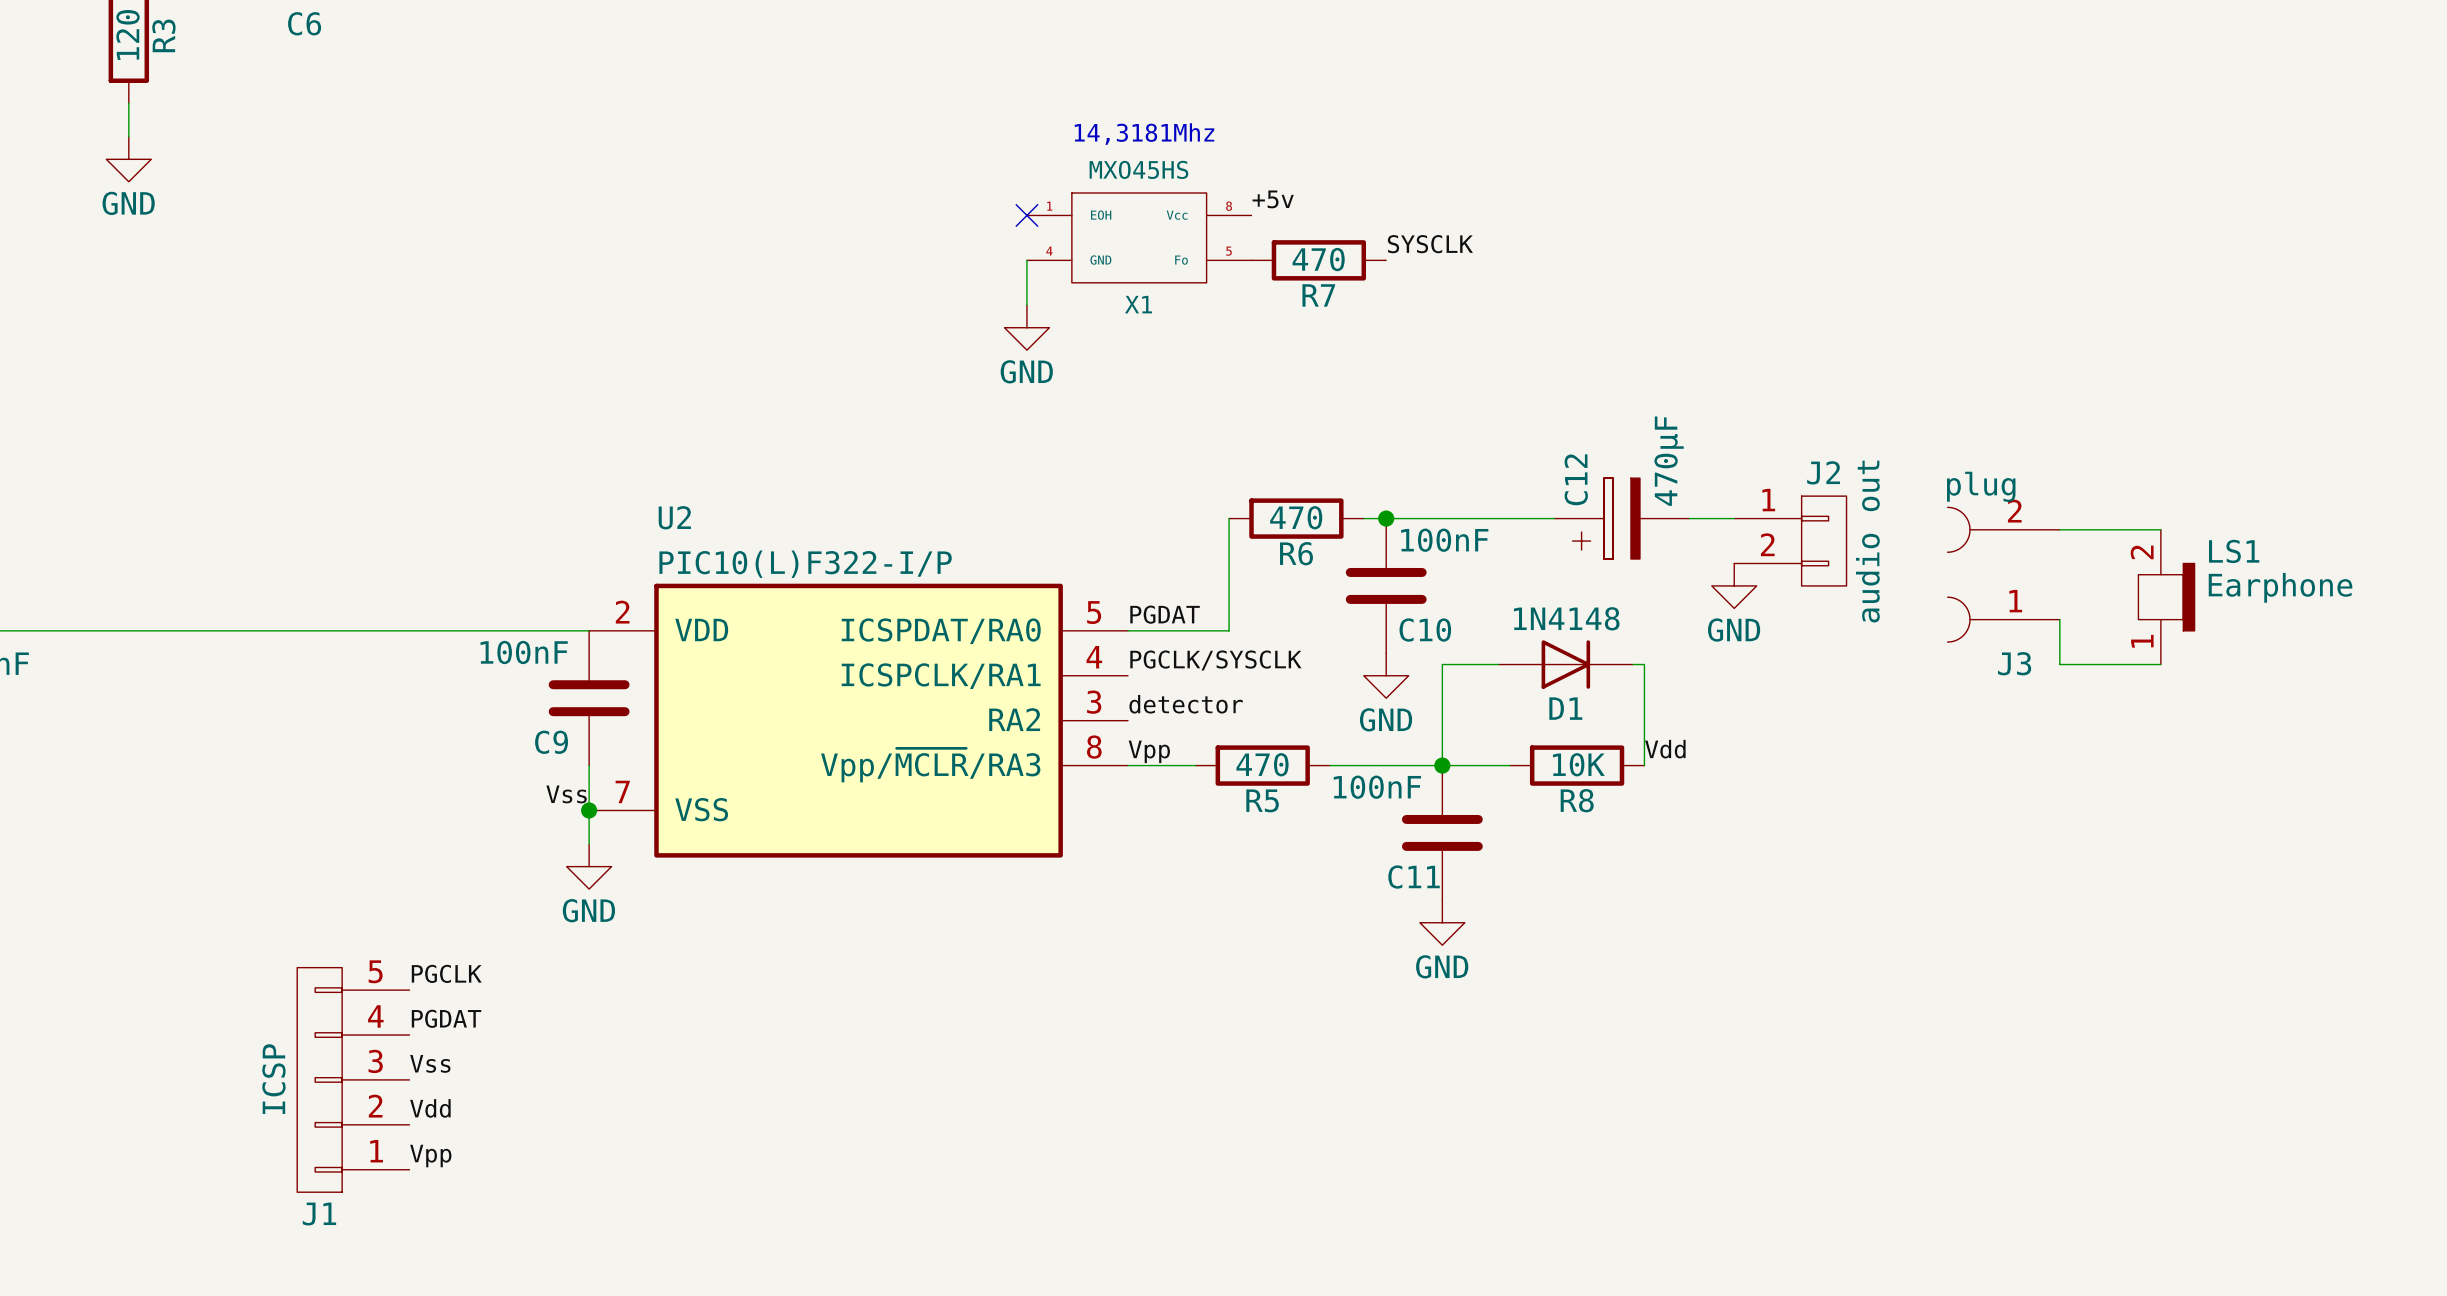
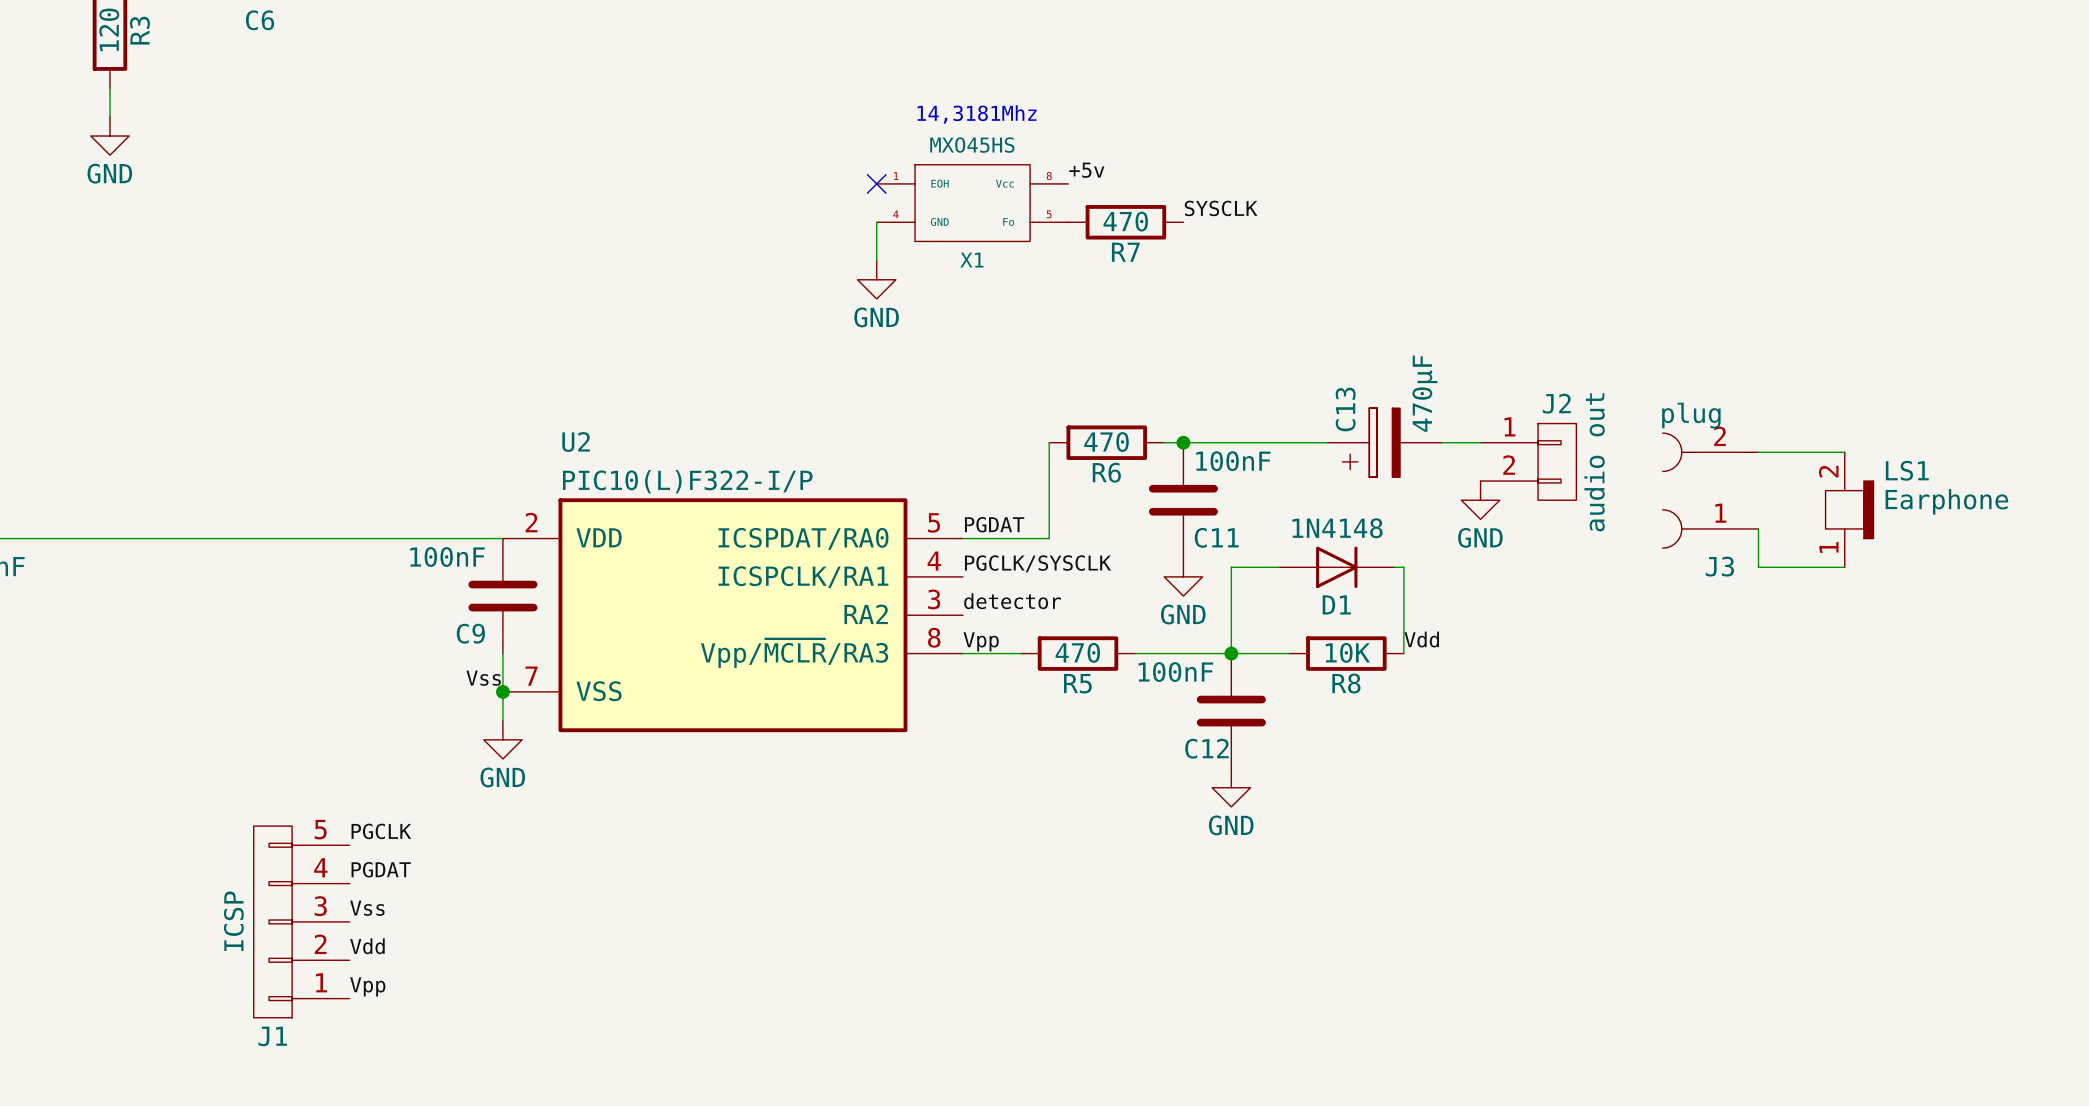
C12 name: C12 (1576, 479) -> C13 (1345, 409)
C10 name: C10 (1425, 630) -> C11 (1216, 537)
C11 name: C11 (1414, 877) -> C12 (1206, 748)

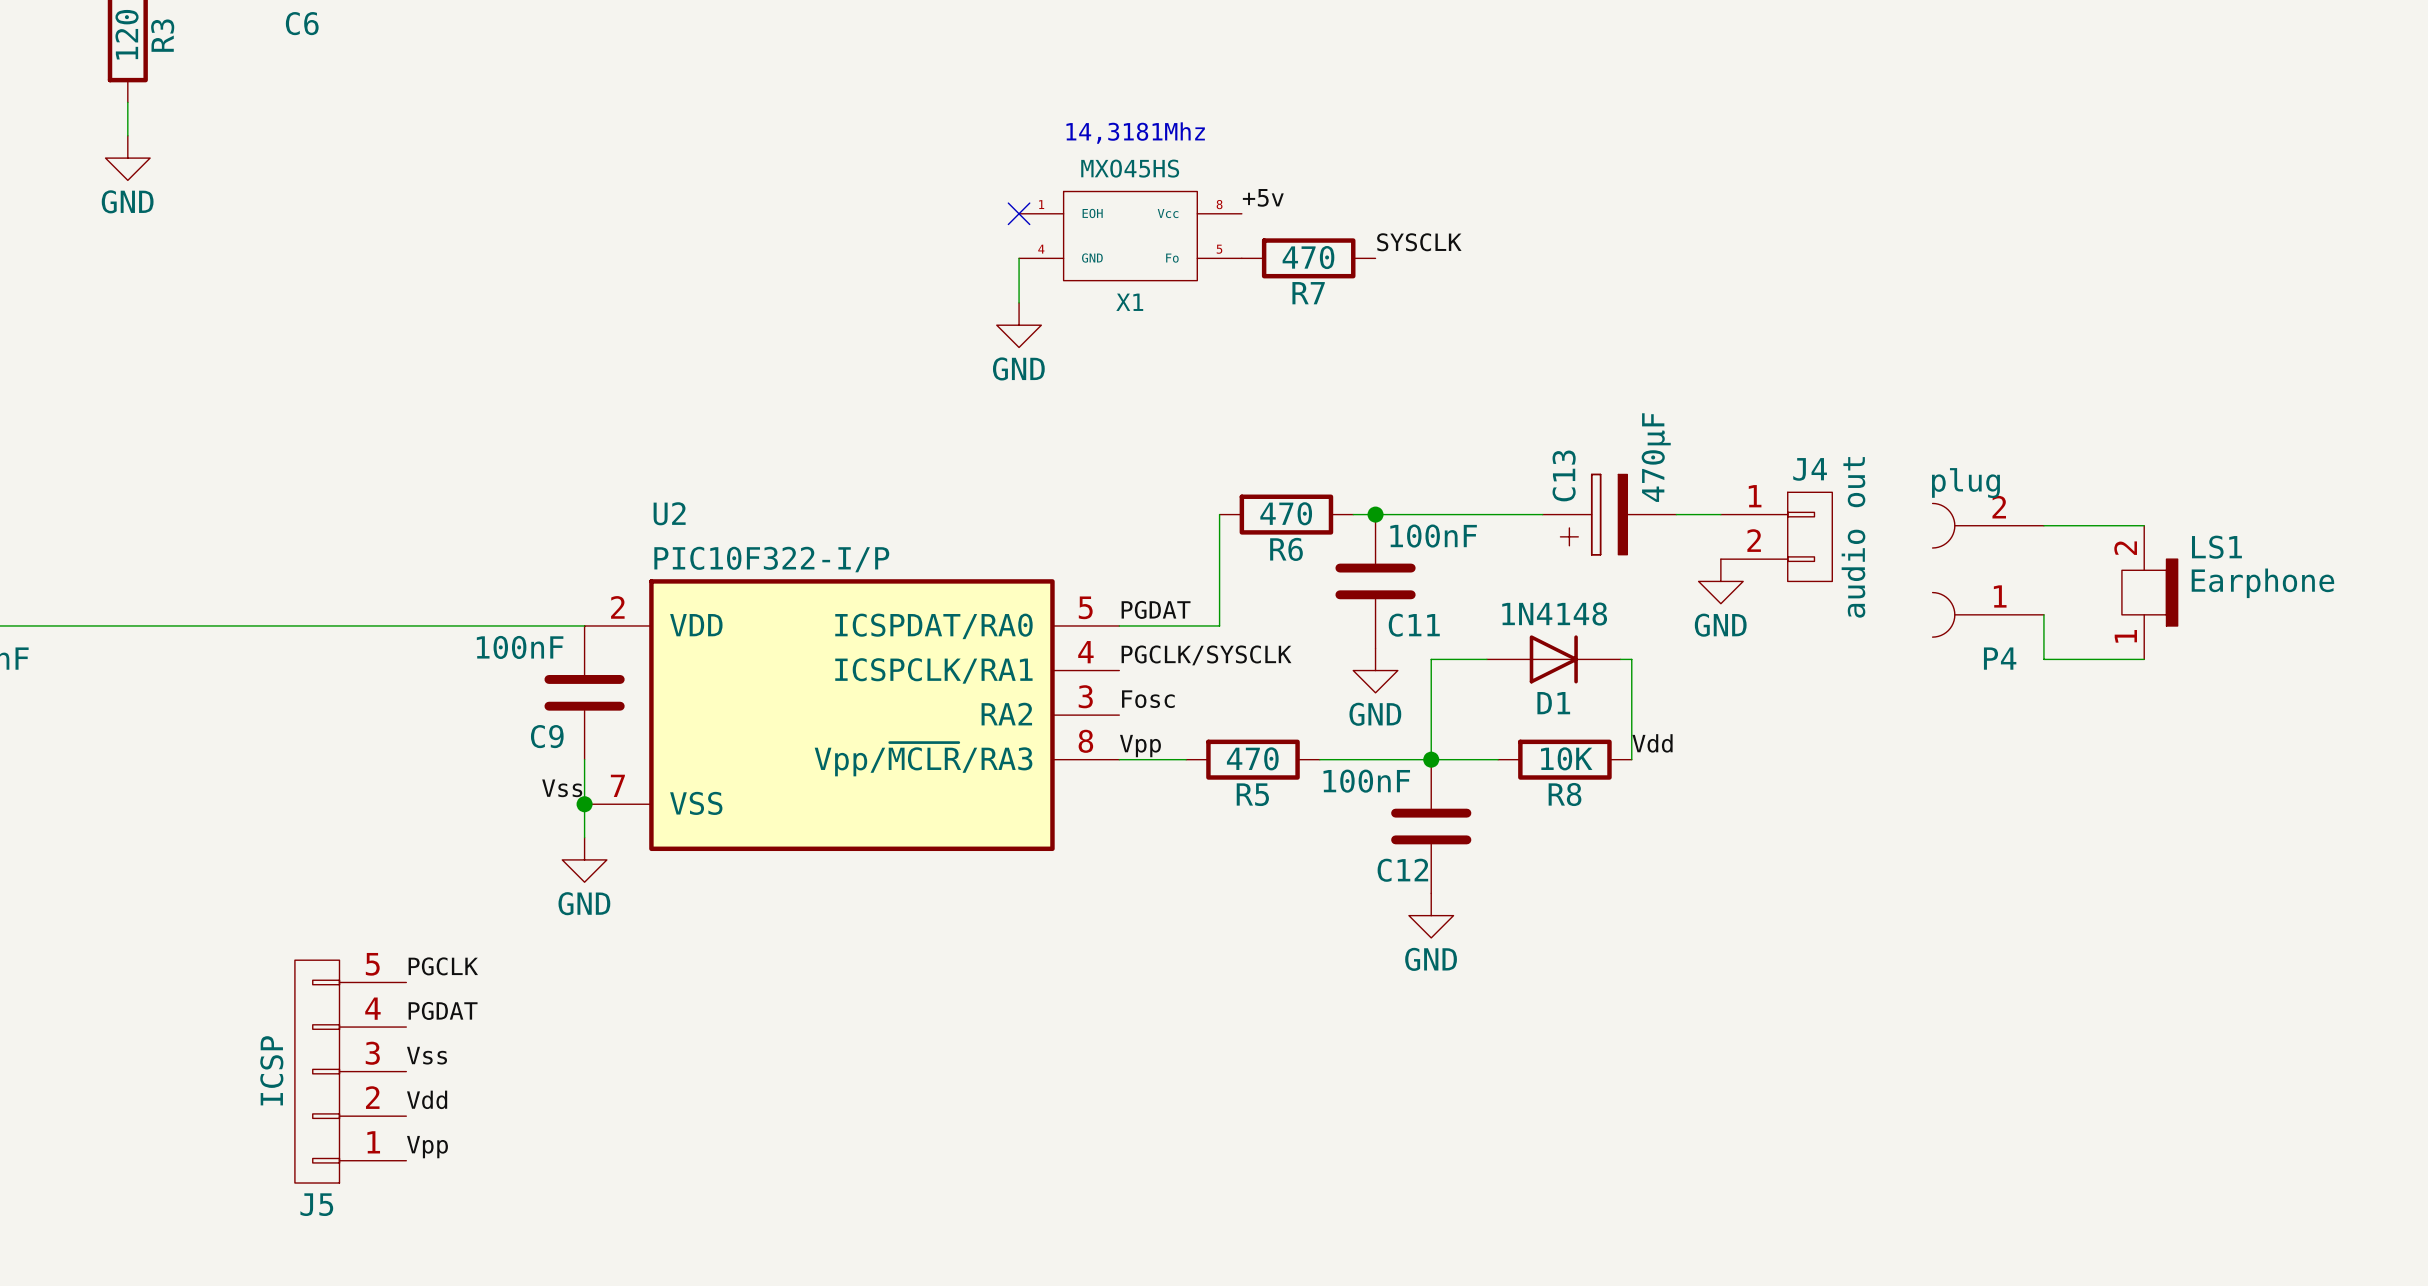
J2 name: J2 (1556, 403) -> J4 (1810, 469)
U2 value: PIC10(L)F322-I/P (687, 481) -> PIC10F322-I/P (771, 559)
J3 name: J3 (1719, 566) -> P4 (2000, 658)
label: detector (1012, 601) -> Fosc (1148, 699)
J1 name: J1 (272, 1036) -> J5 (316, 1204)

